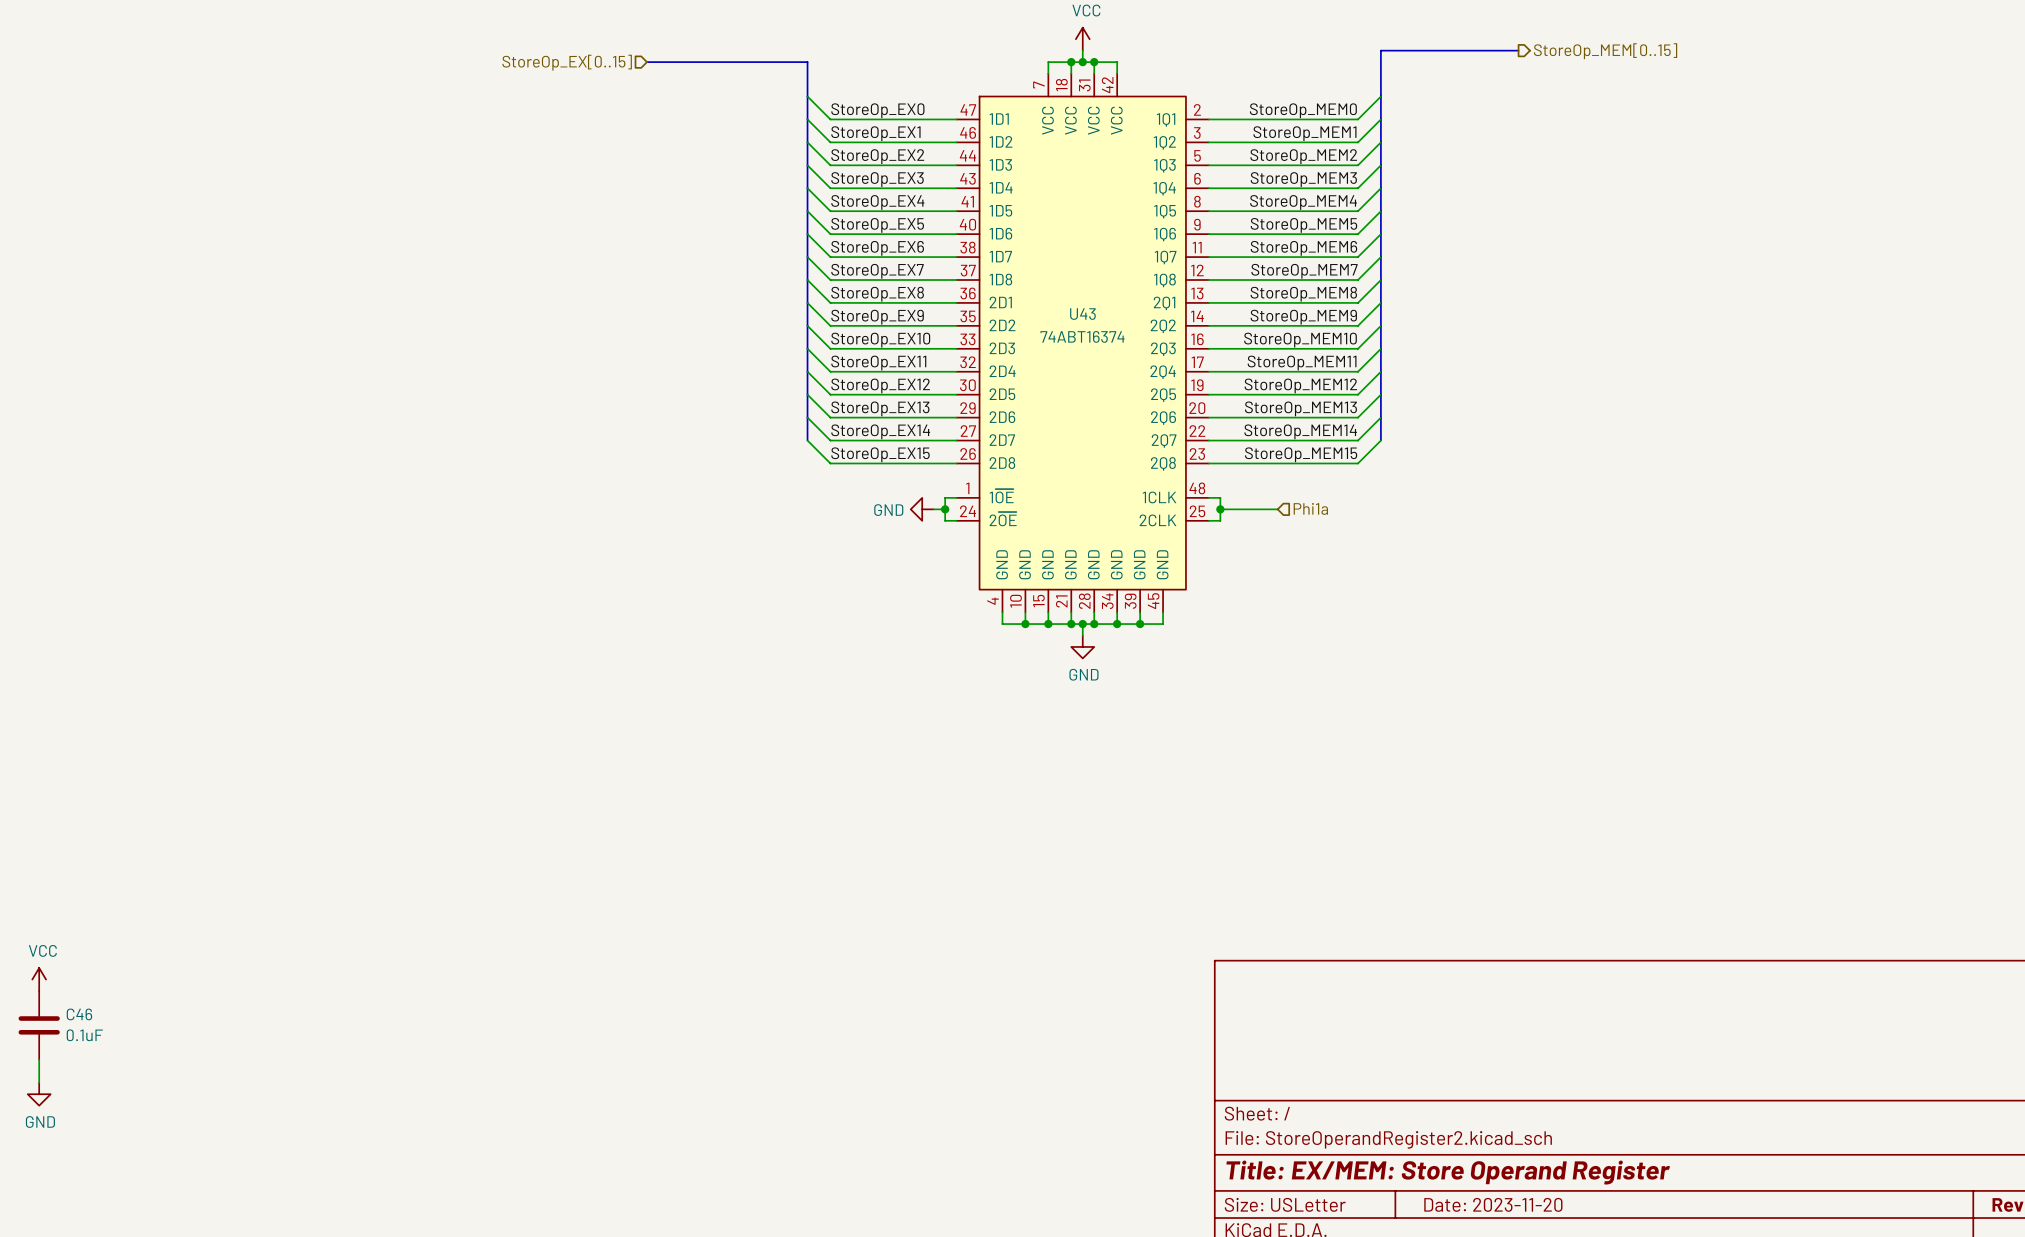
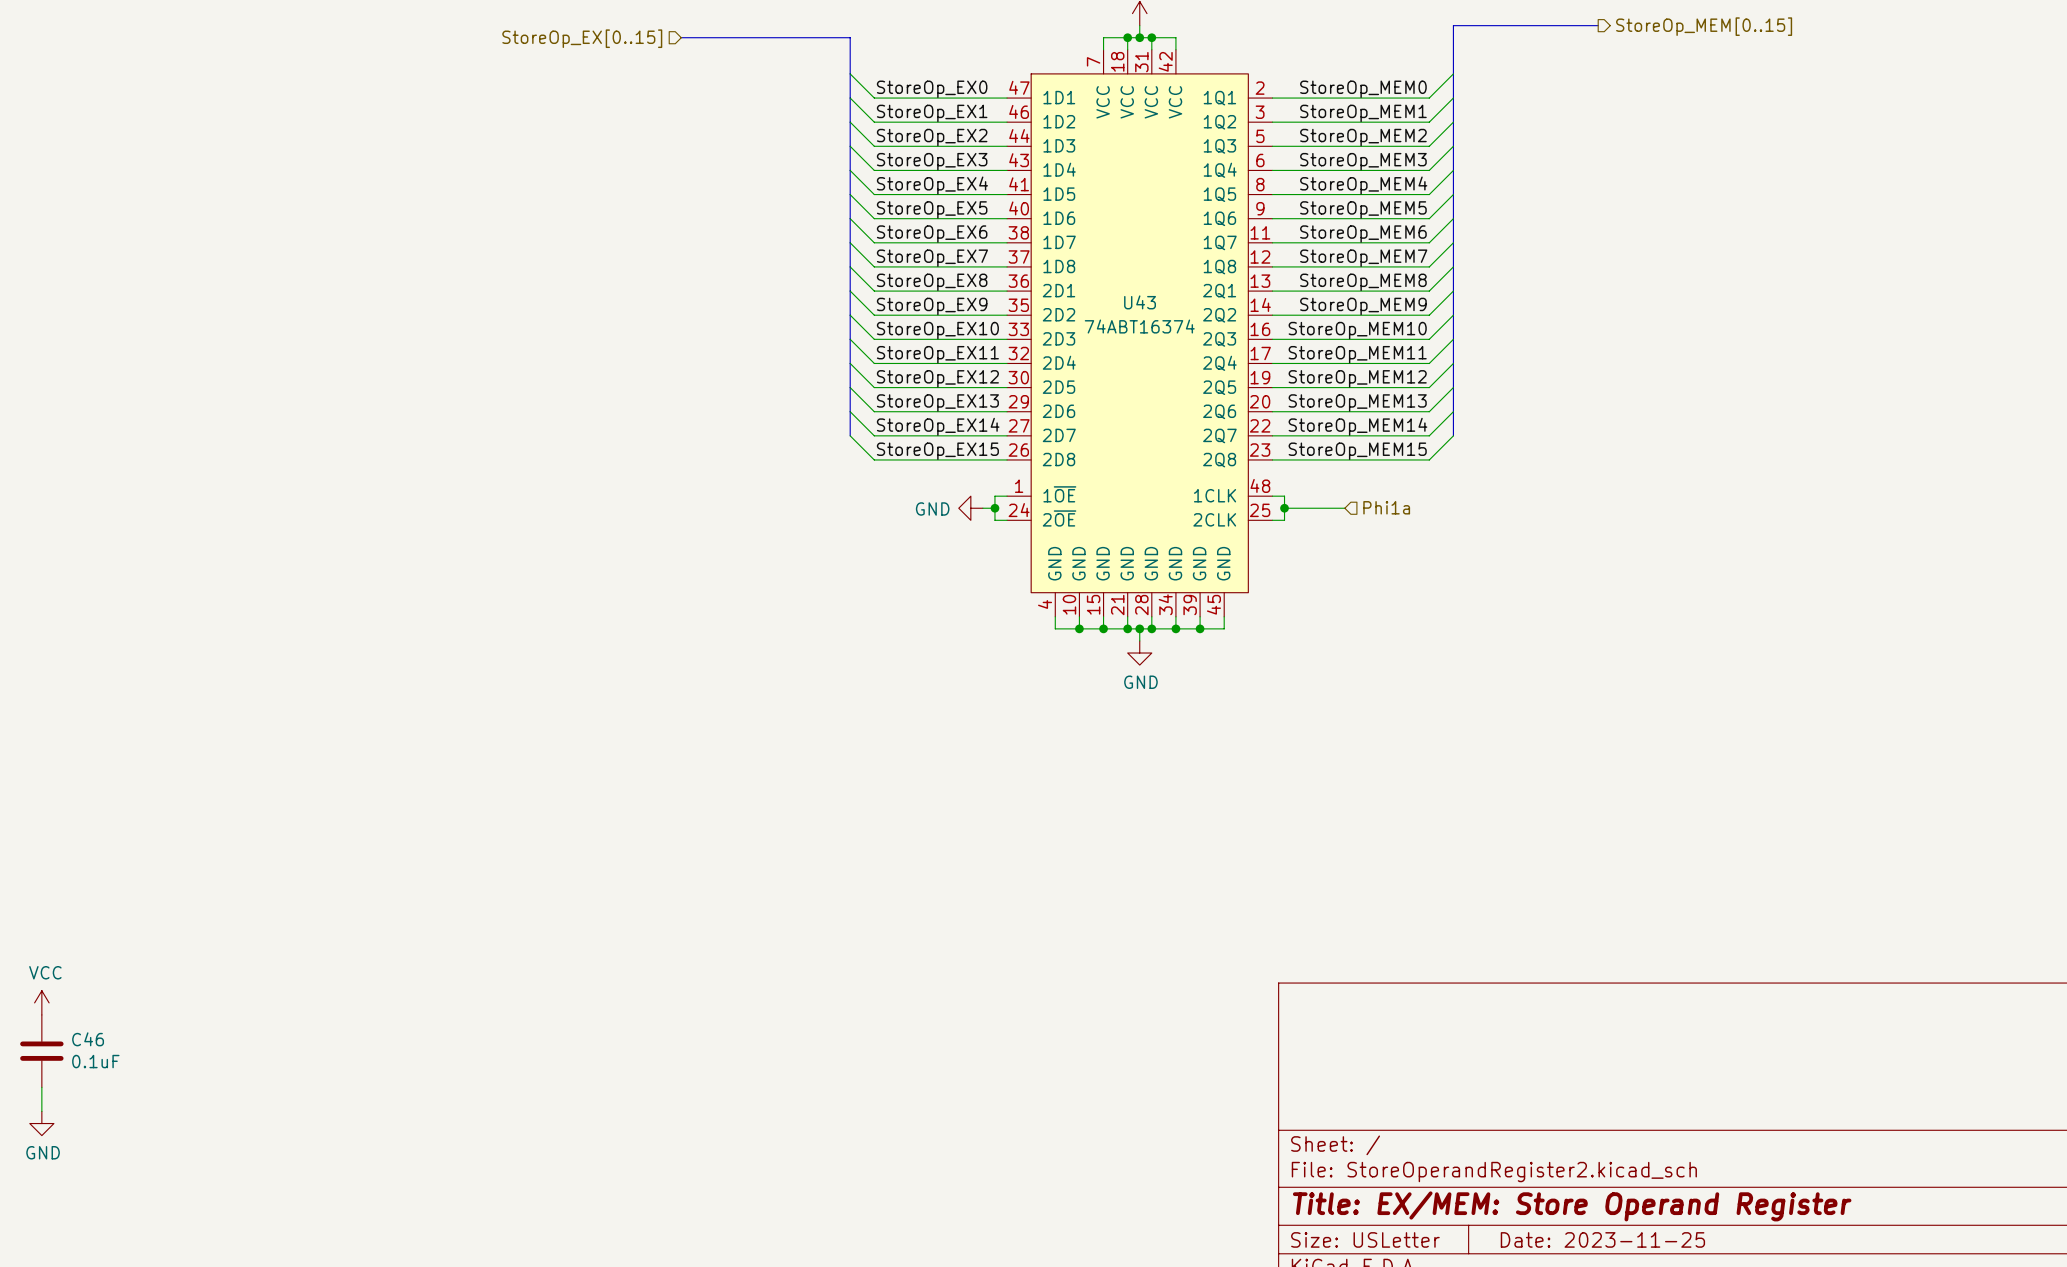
title block: Date: 2023-11-20 (1493, 1204) -> Date: 2023-11-25 (1602, 1239)

